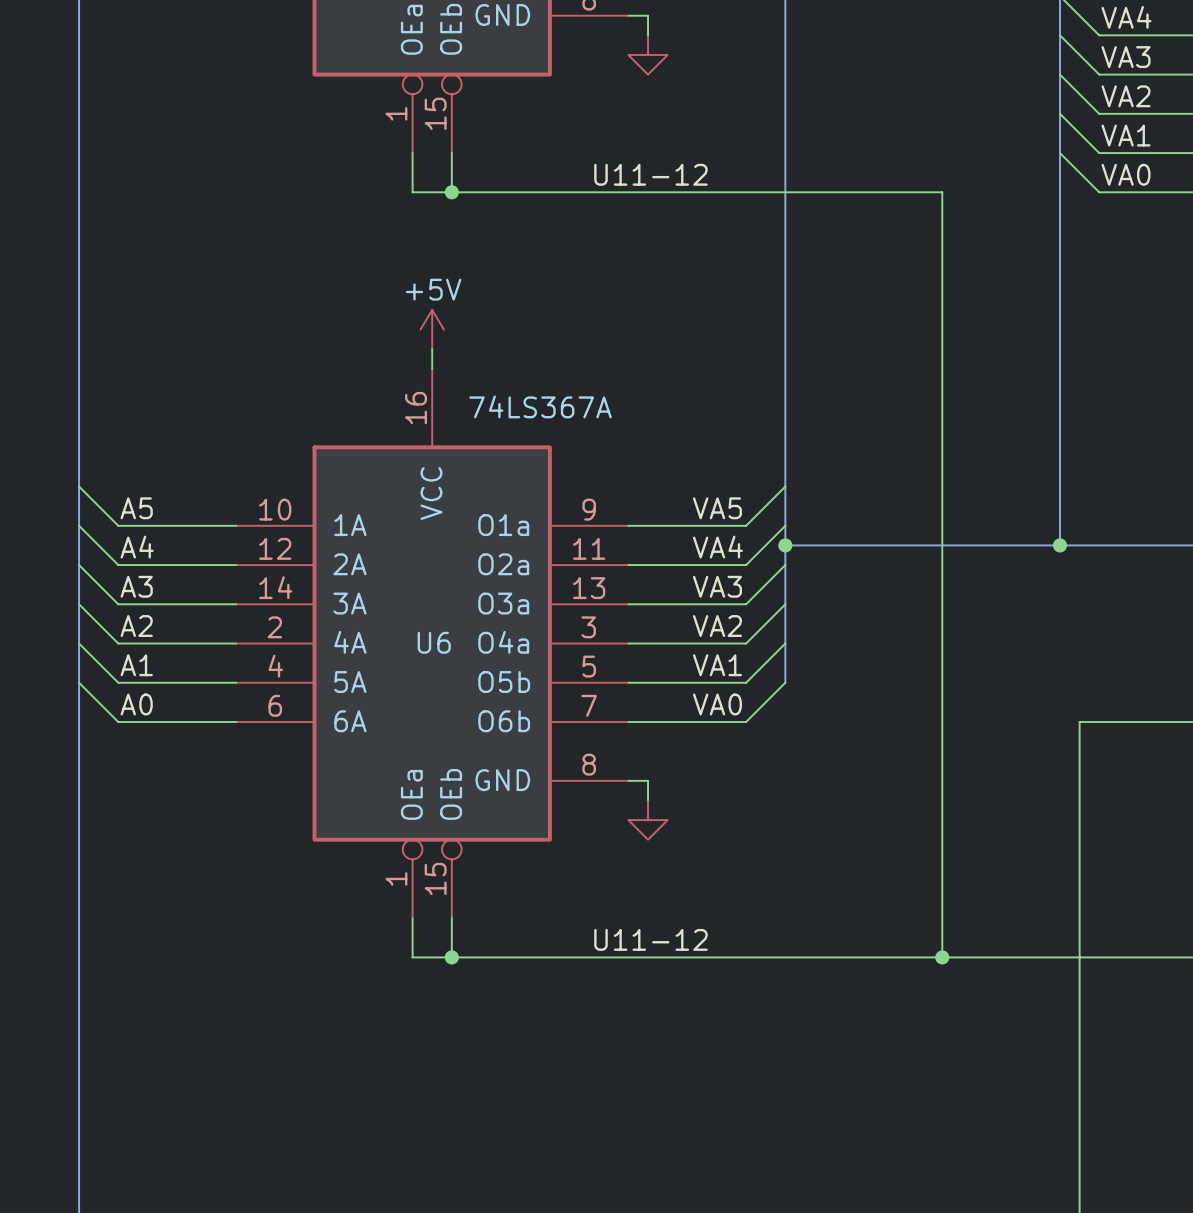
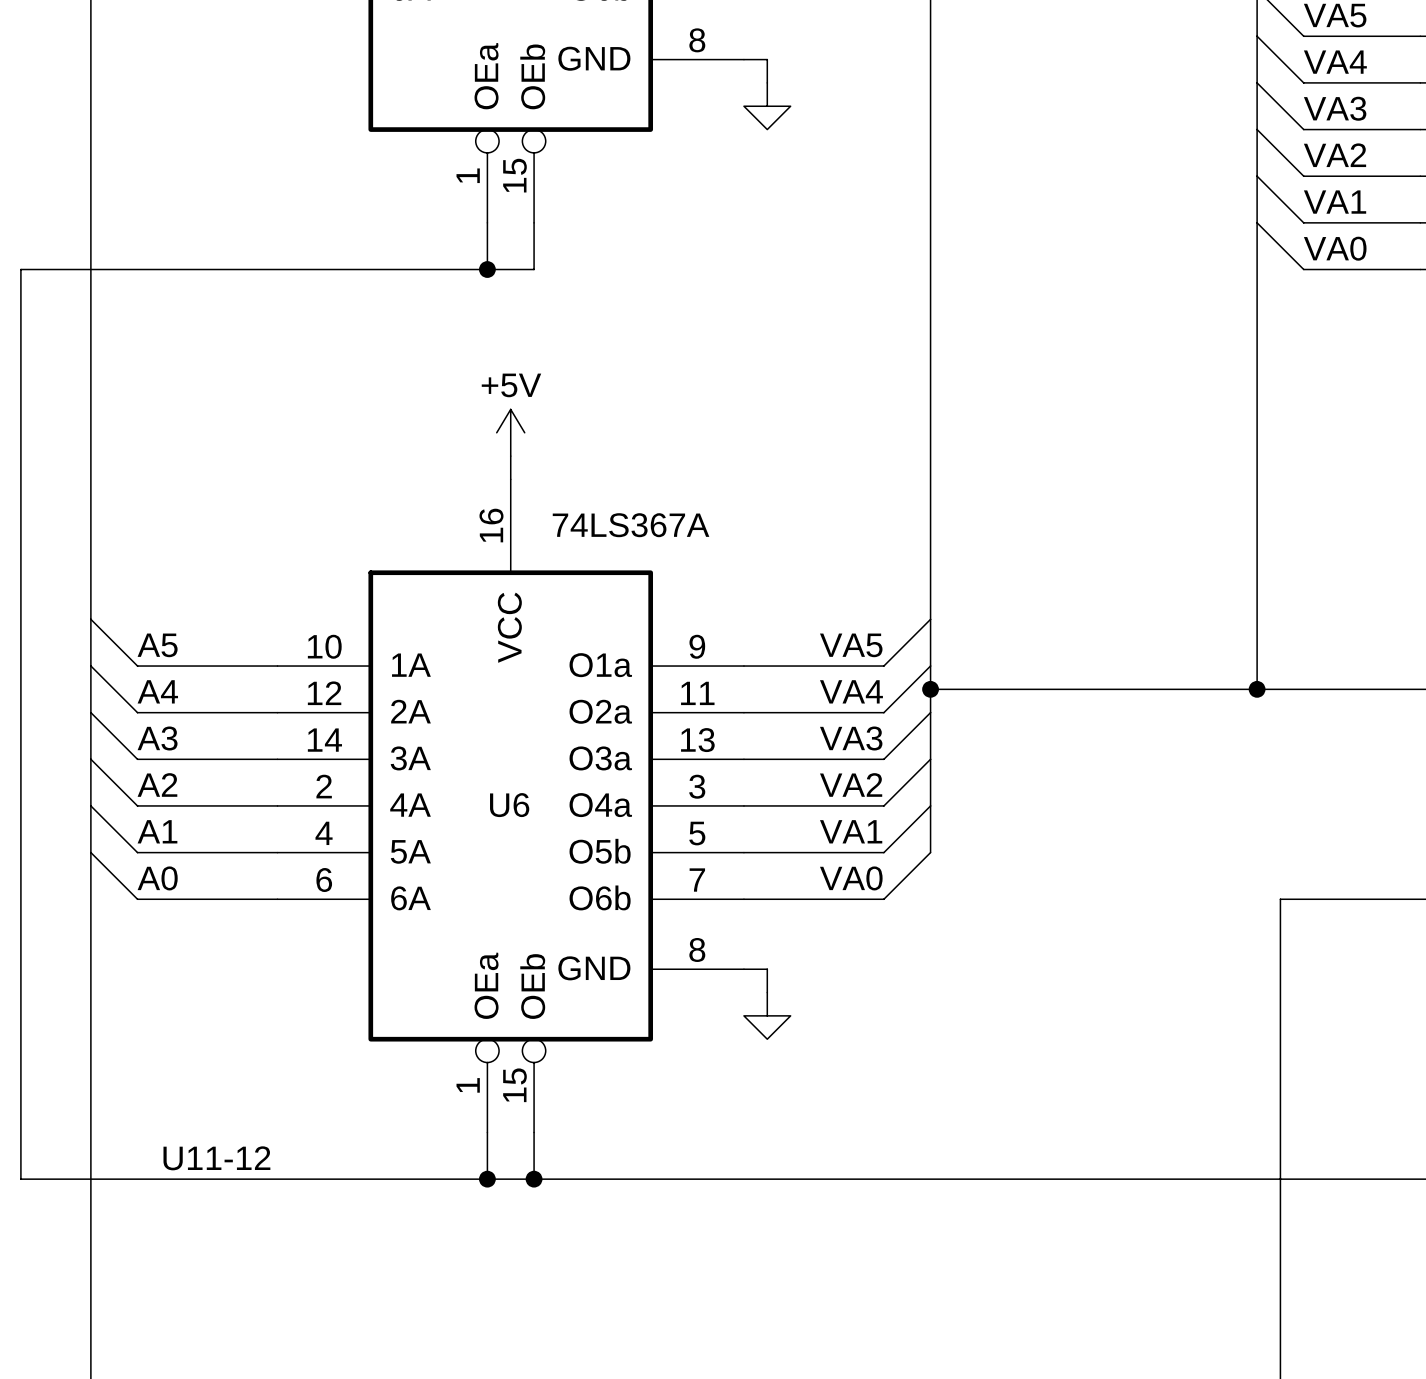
label: U11-12 (650, 174) -> none
wire: none -> (487, 269) (20, 269) (20, 1179) (487, 1179)
wire: (451, 192) (942, 192) (942, 957) -> none
junction position: (451, 192) -> (487, 269)
label: none -> U11-12 (216, 1158)
label: U11-12 (650, 939) -> none
junction: none -> (487, 1179)
junction: (942, 957) -> none

